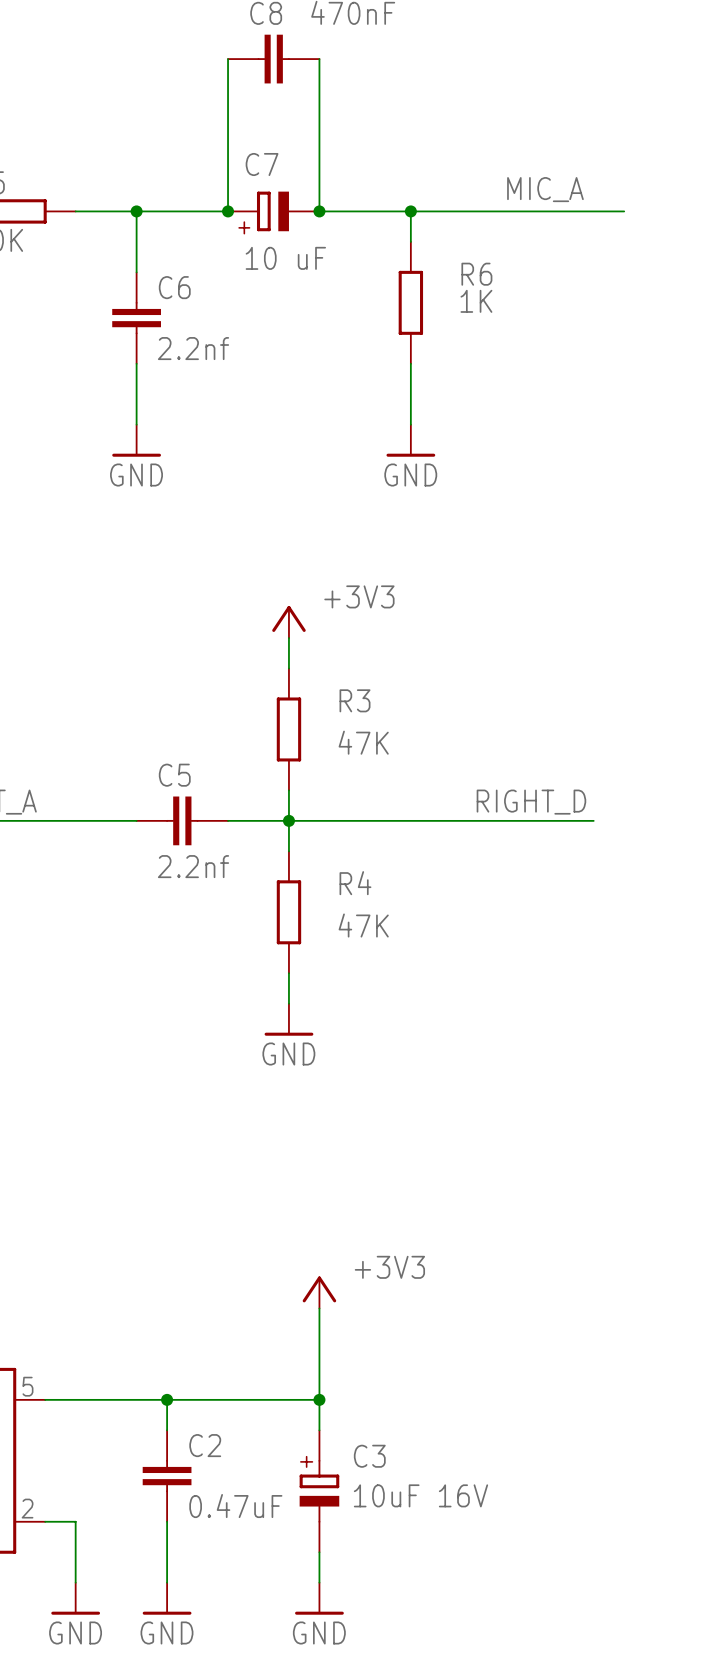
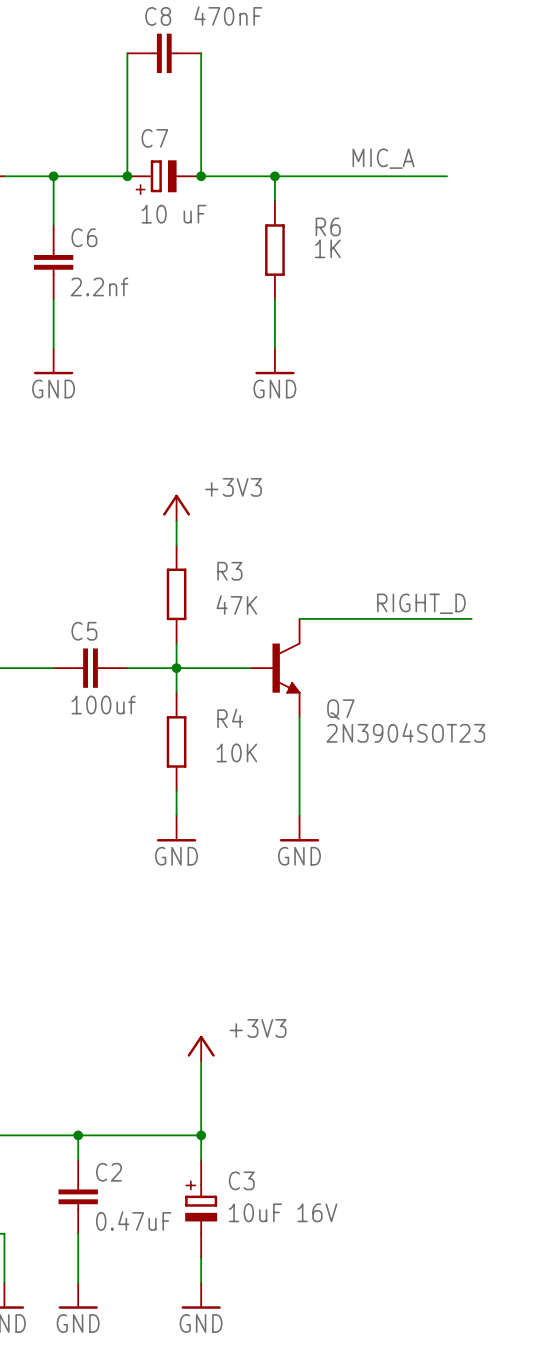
label position: RIGHT_D (531, 802) -> RIGHT_D (421, 603)
wire: (380, 820) (593, 820) -> (299, 618) (471, 618)
Q7: none -> 2N3904SOT23 (275, 668)
C5 value: 2.2nf (193, 866) -> 100uf (103, 705)
wire: none -> (299, 717) (299, 815)
R4 value: 47K (363, 925) -> 10K (236, 752)
power symbol: none -> GND (299, 828)

